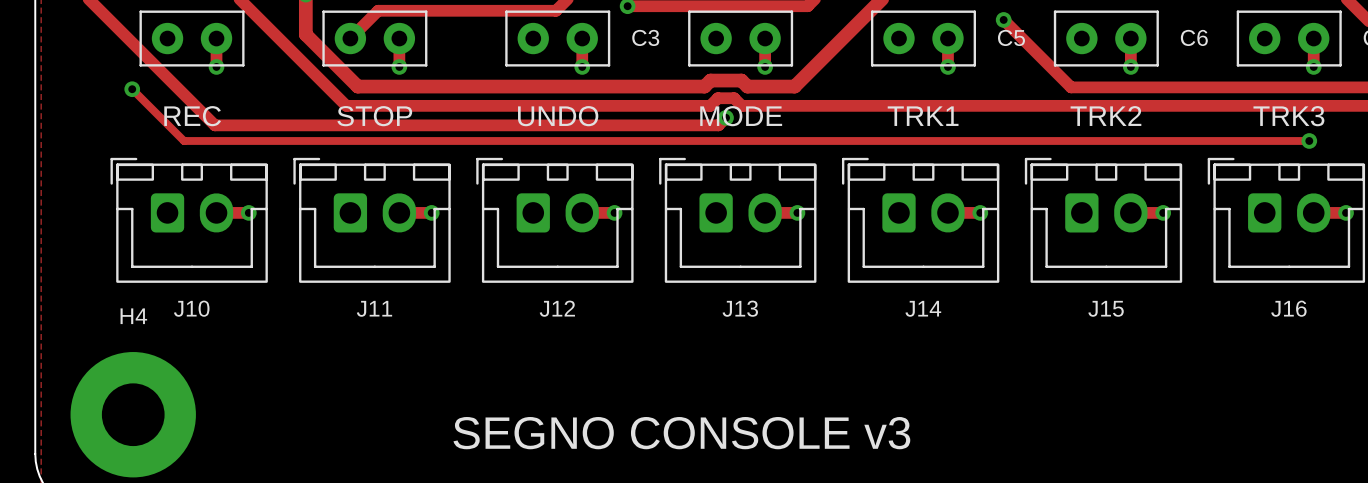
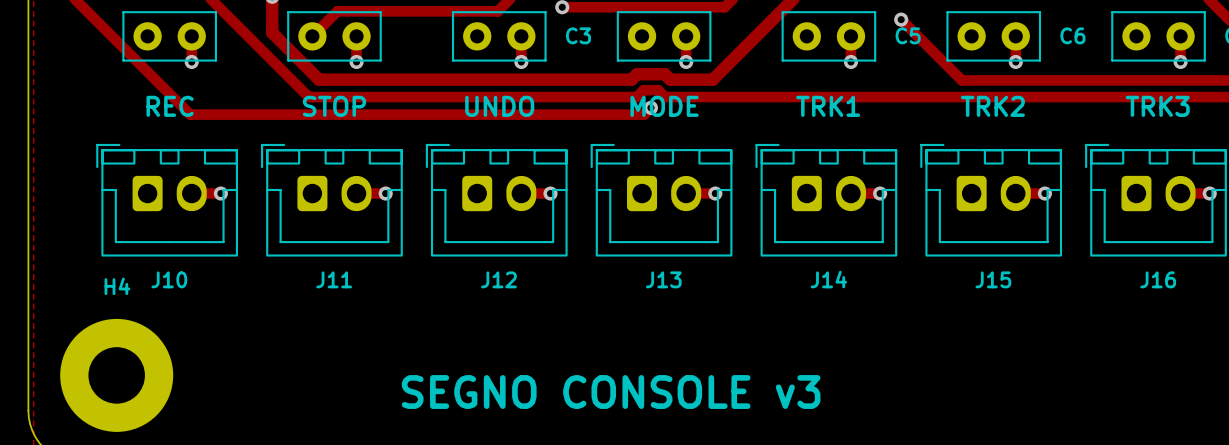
track: (132, 89) (184, 140) (1309, 140) -> none
via: (132, 89) -> none
via: (1309, 140) -> none

